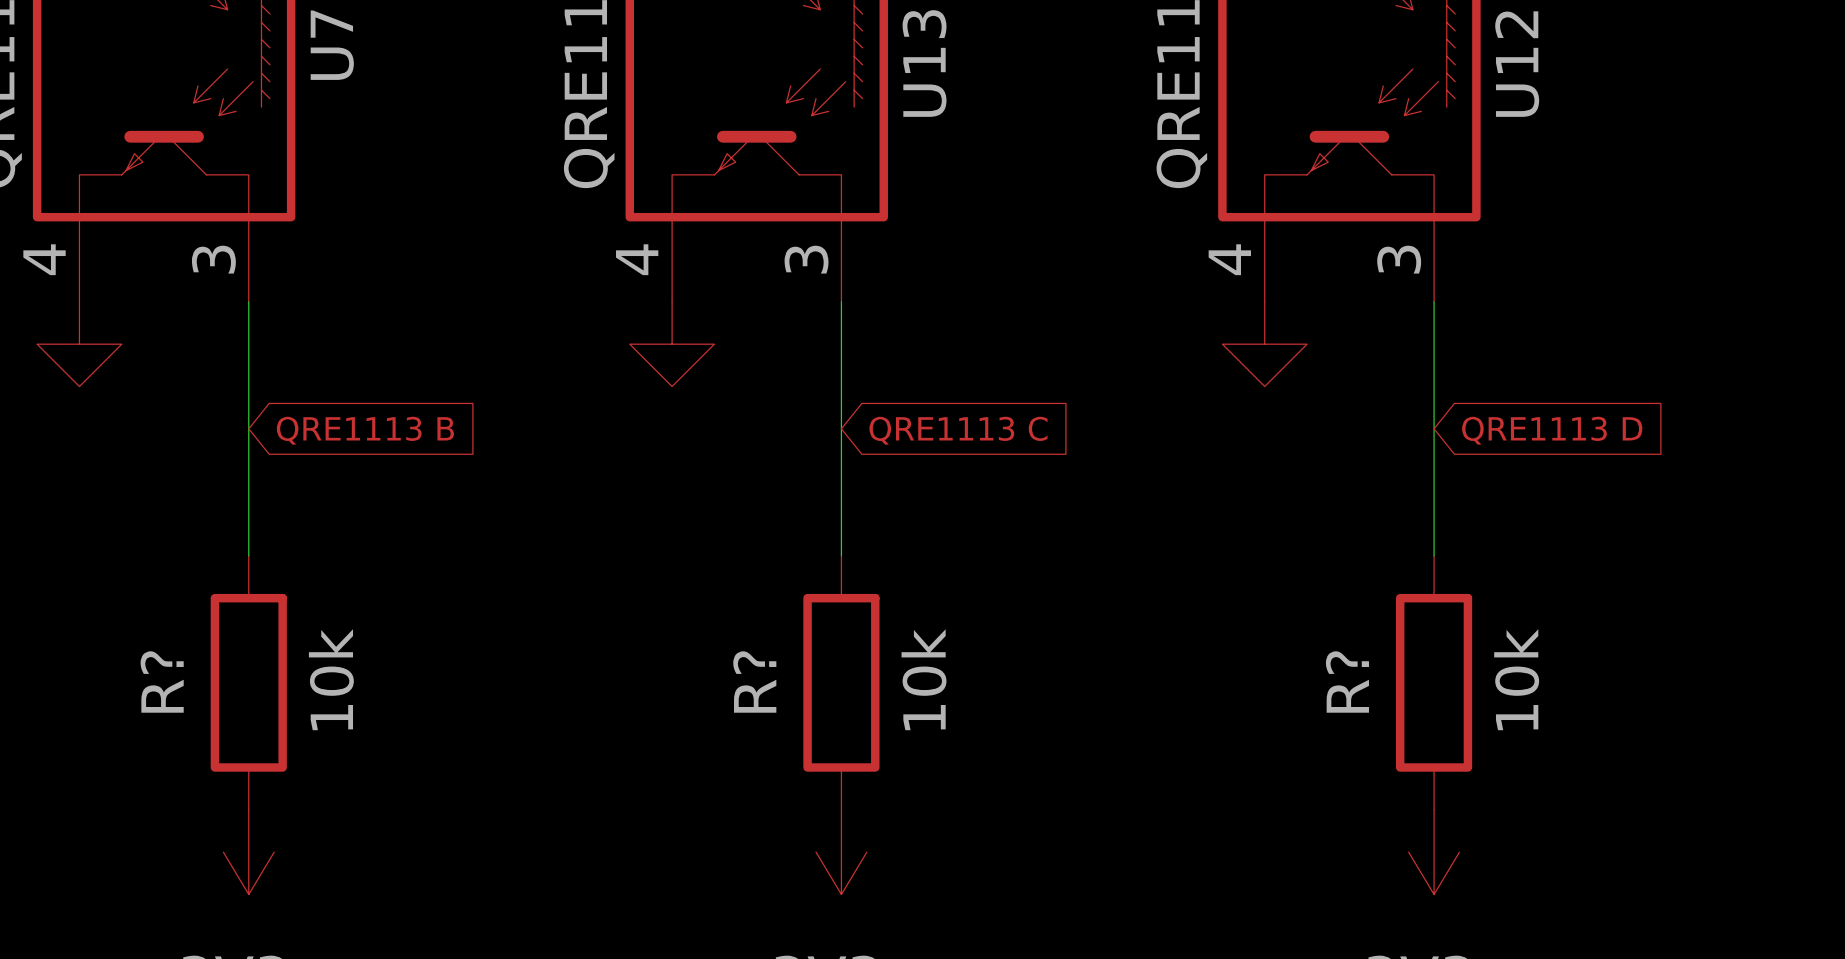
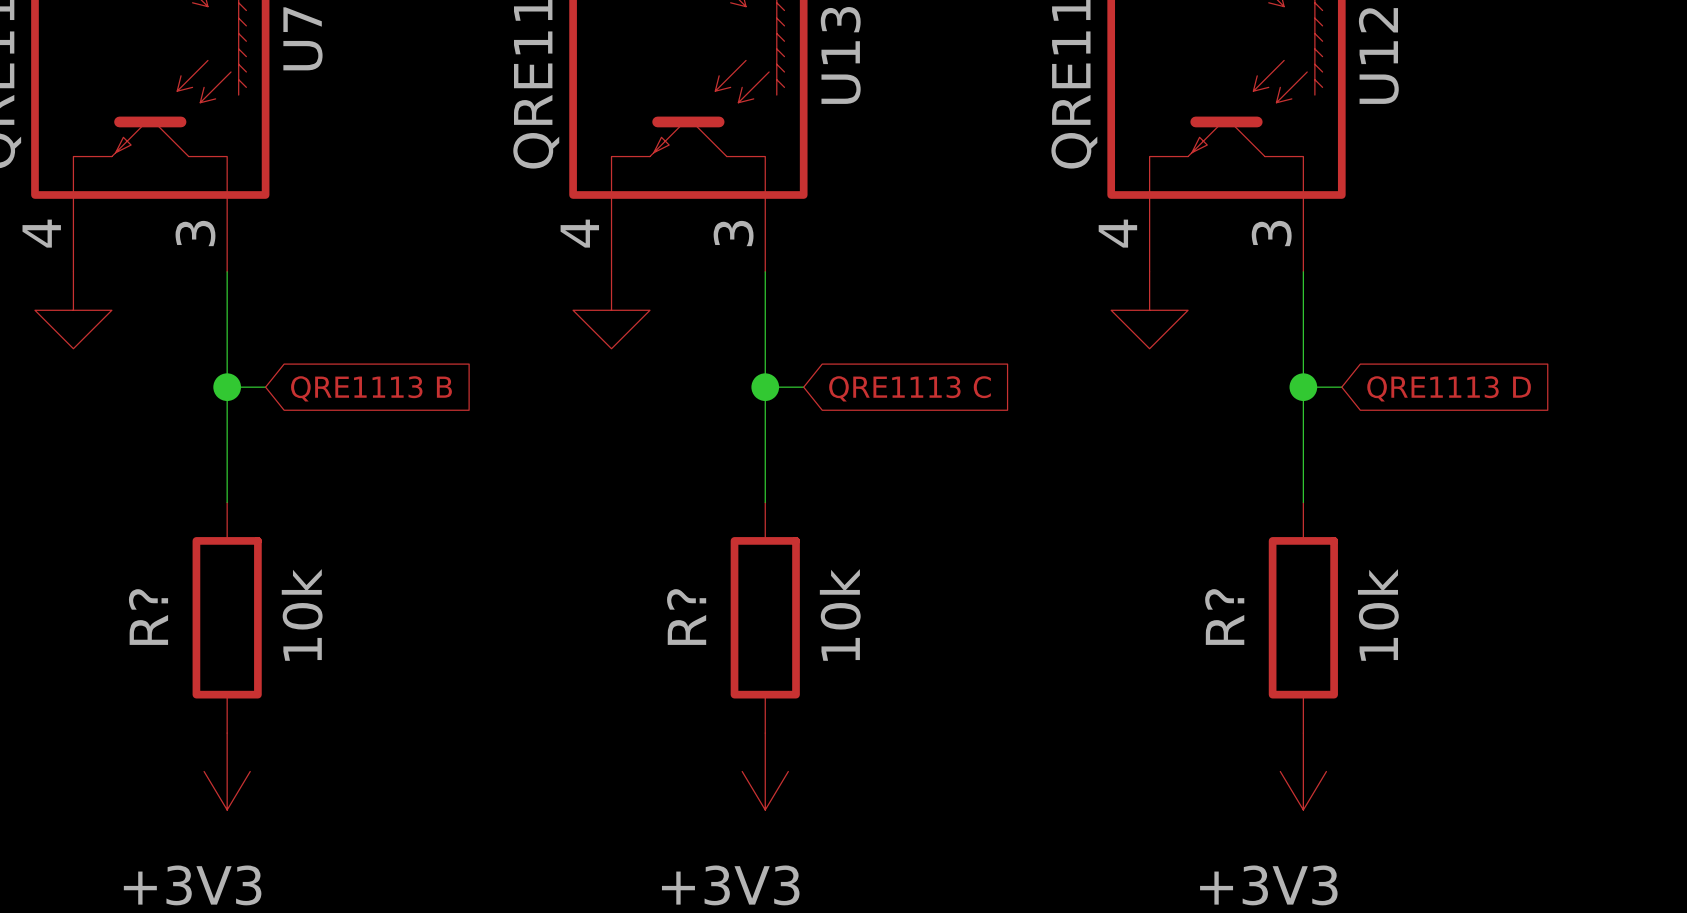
wire: none -> (227, 387) (265, 387)
junction: none -> (227, 387)
wire: none -> (765, 387) (803, 387)
junction: none -> (765, 387)
wire: none -> (1303, 387) (1341, 387)
junction: none -> (1303, 387)
global label position: QRE1113 B (365, 430) -> QRE1113 B (371, 388)
global label position: QRE1113 C (958, 430) -> QRE1113 C (910, 388)
global label position: QRE1113 D (1552, 430) -> QRE1113 D (1449, 388)

